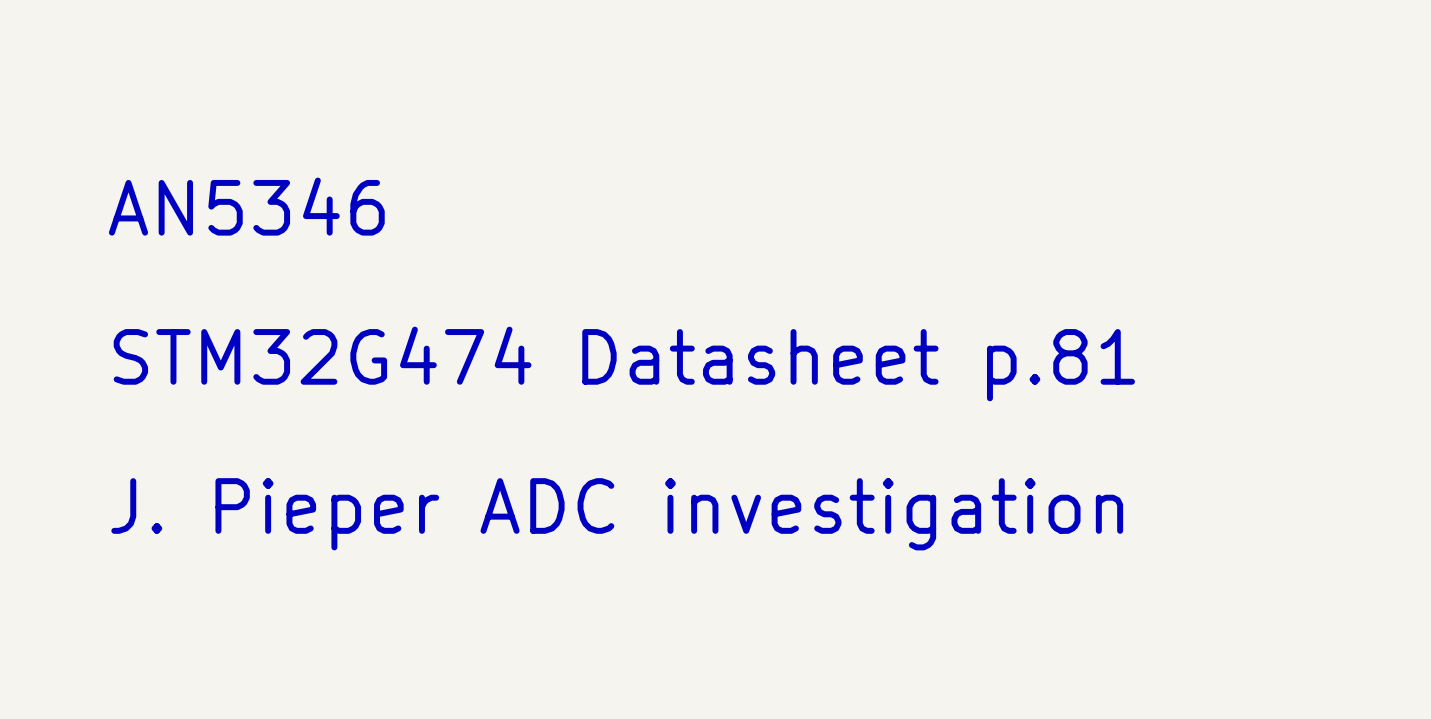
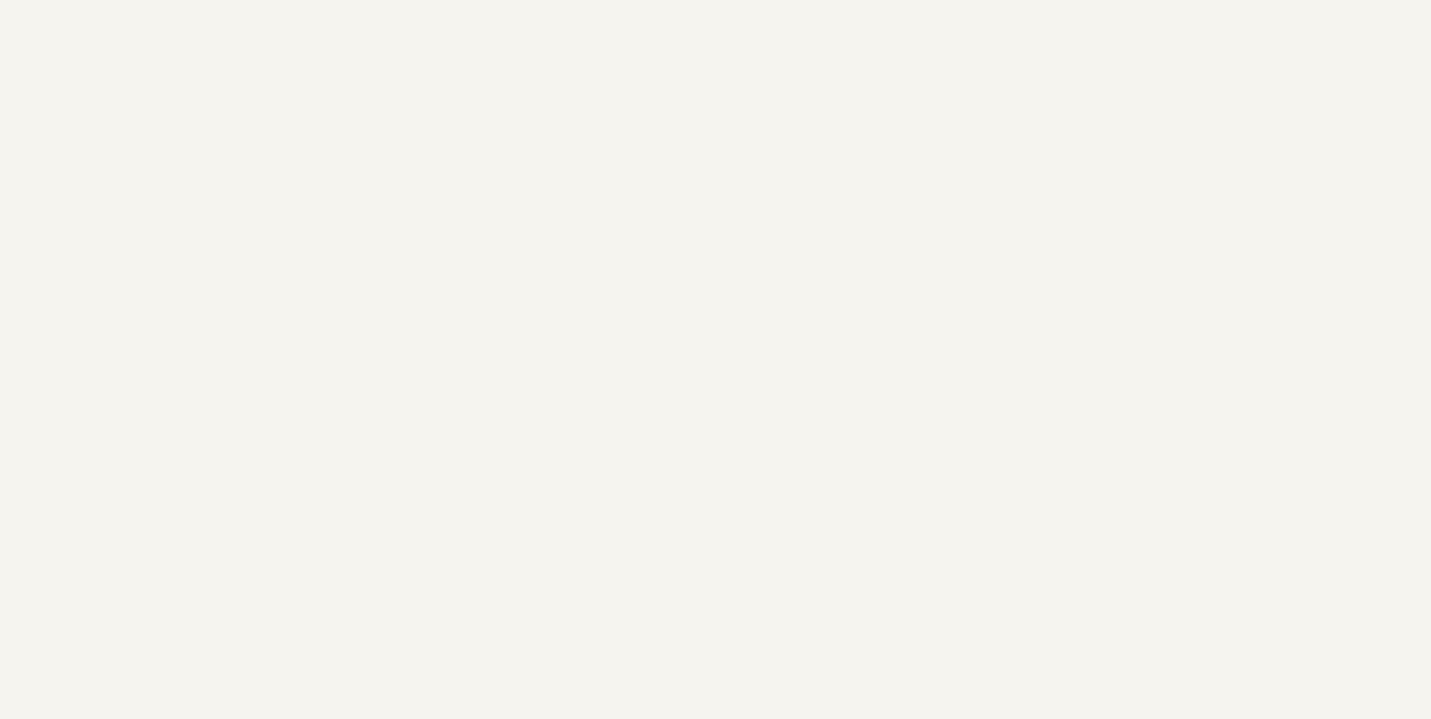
text: AN5346 (246, 206) -> none
text: STM32G474 Datasheet p.81 (624, 363) -> none
text: J. Pieper ADC investigation (617, 514) -> none

